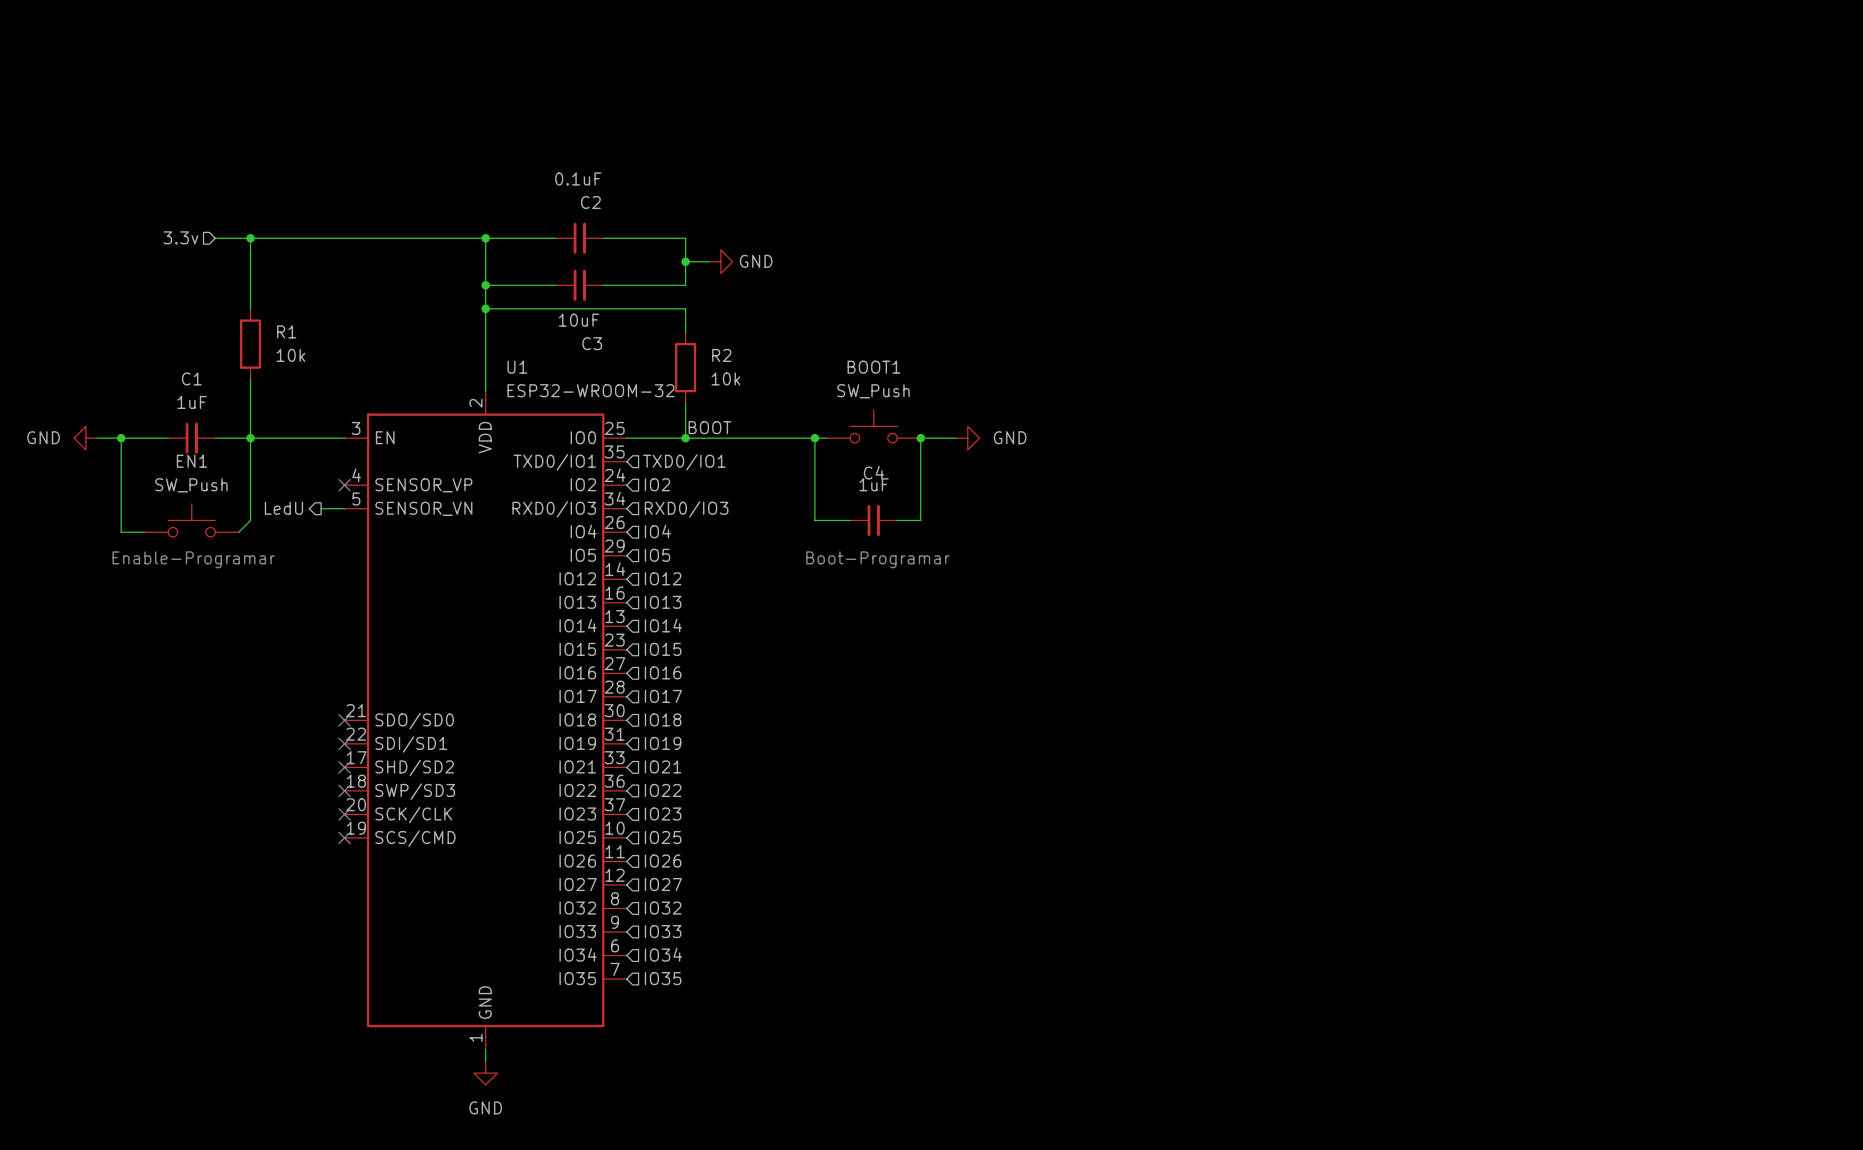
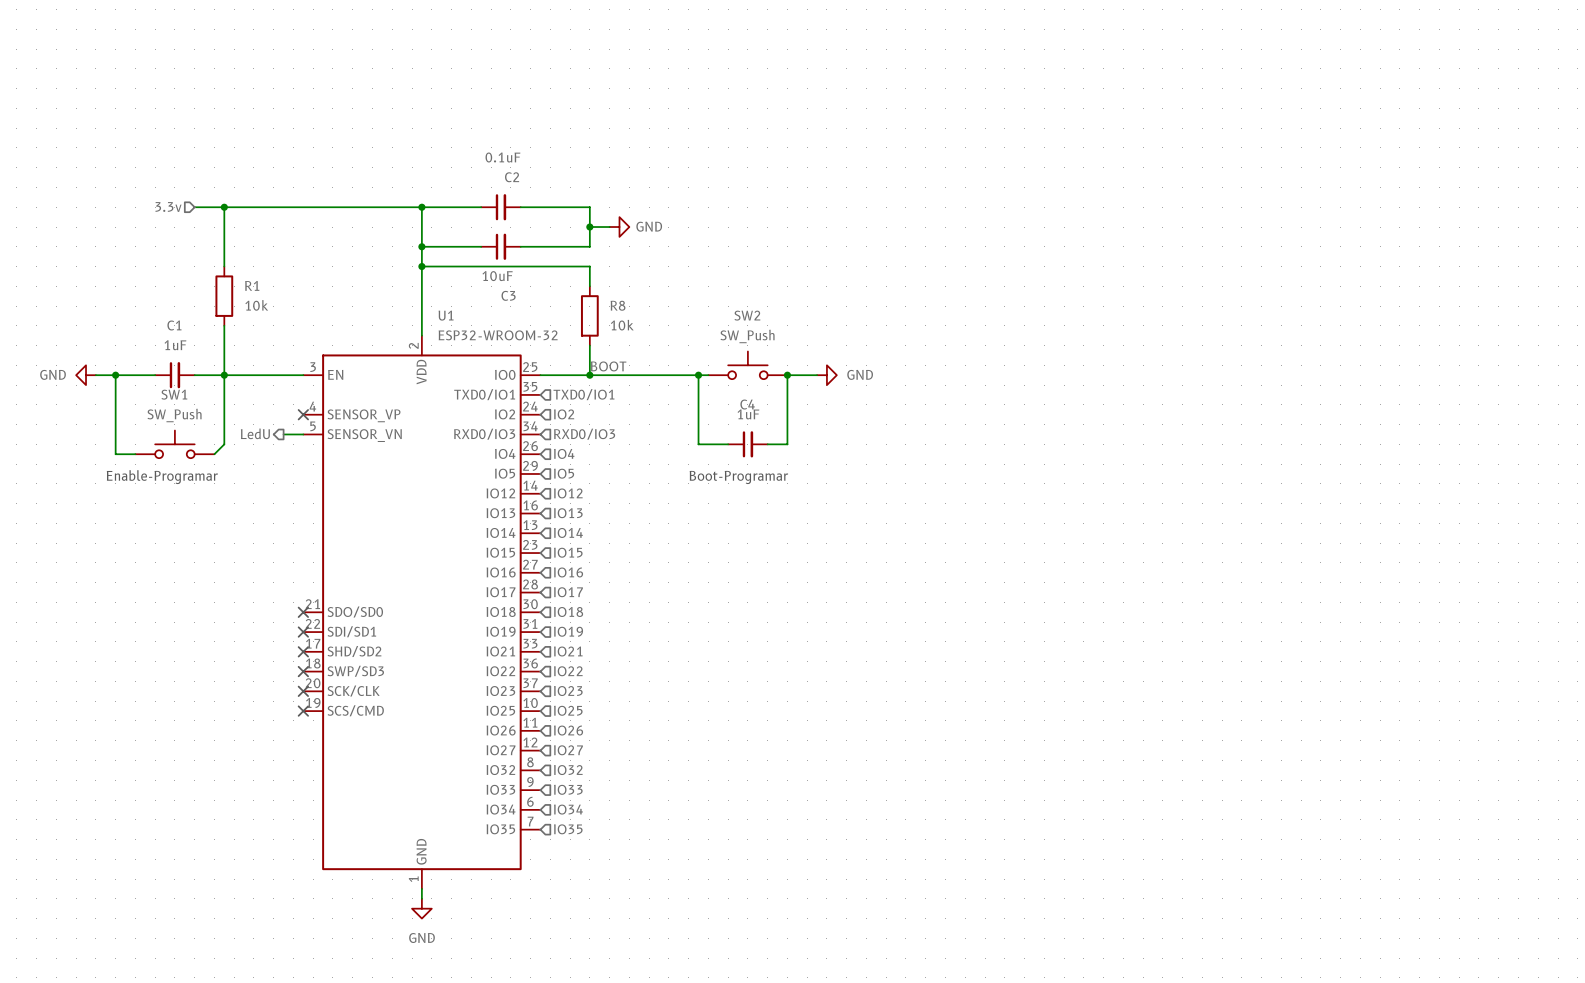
R2 name: R2 (721, 355) -> R8 (618, 305)
BOOT1 name: BOOT1 (874, 367) -> SW2 (747, 315)
EN1 name: EN1 (192, 461) -> SW1 (174, 394)

